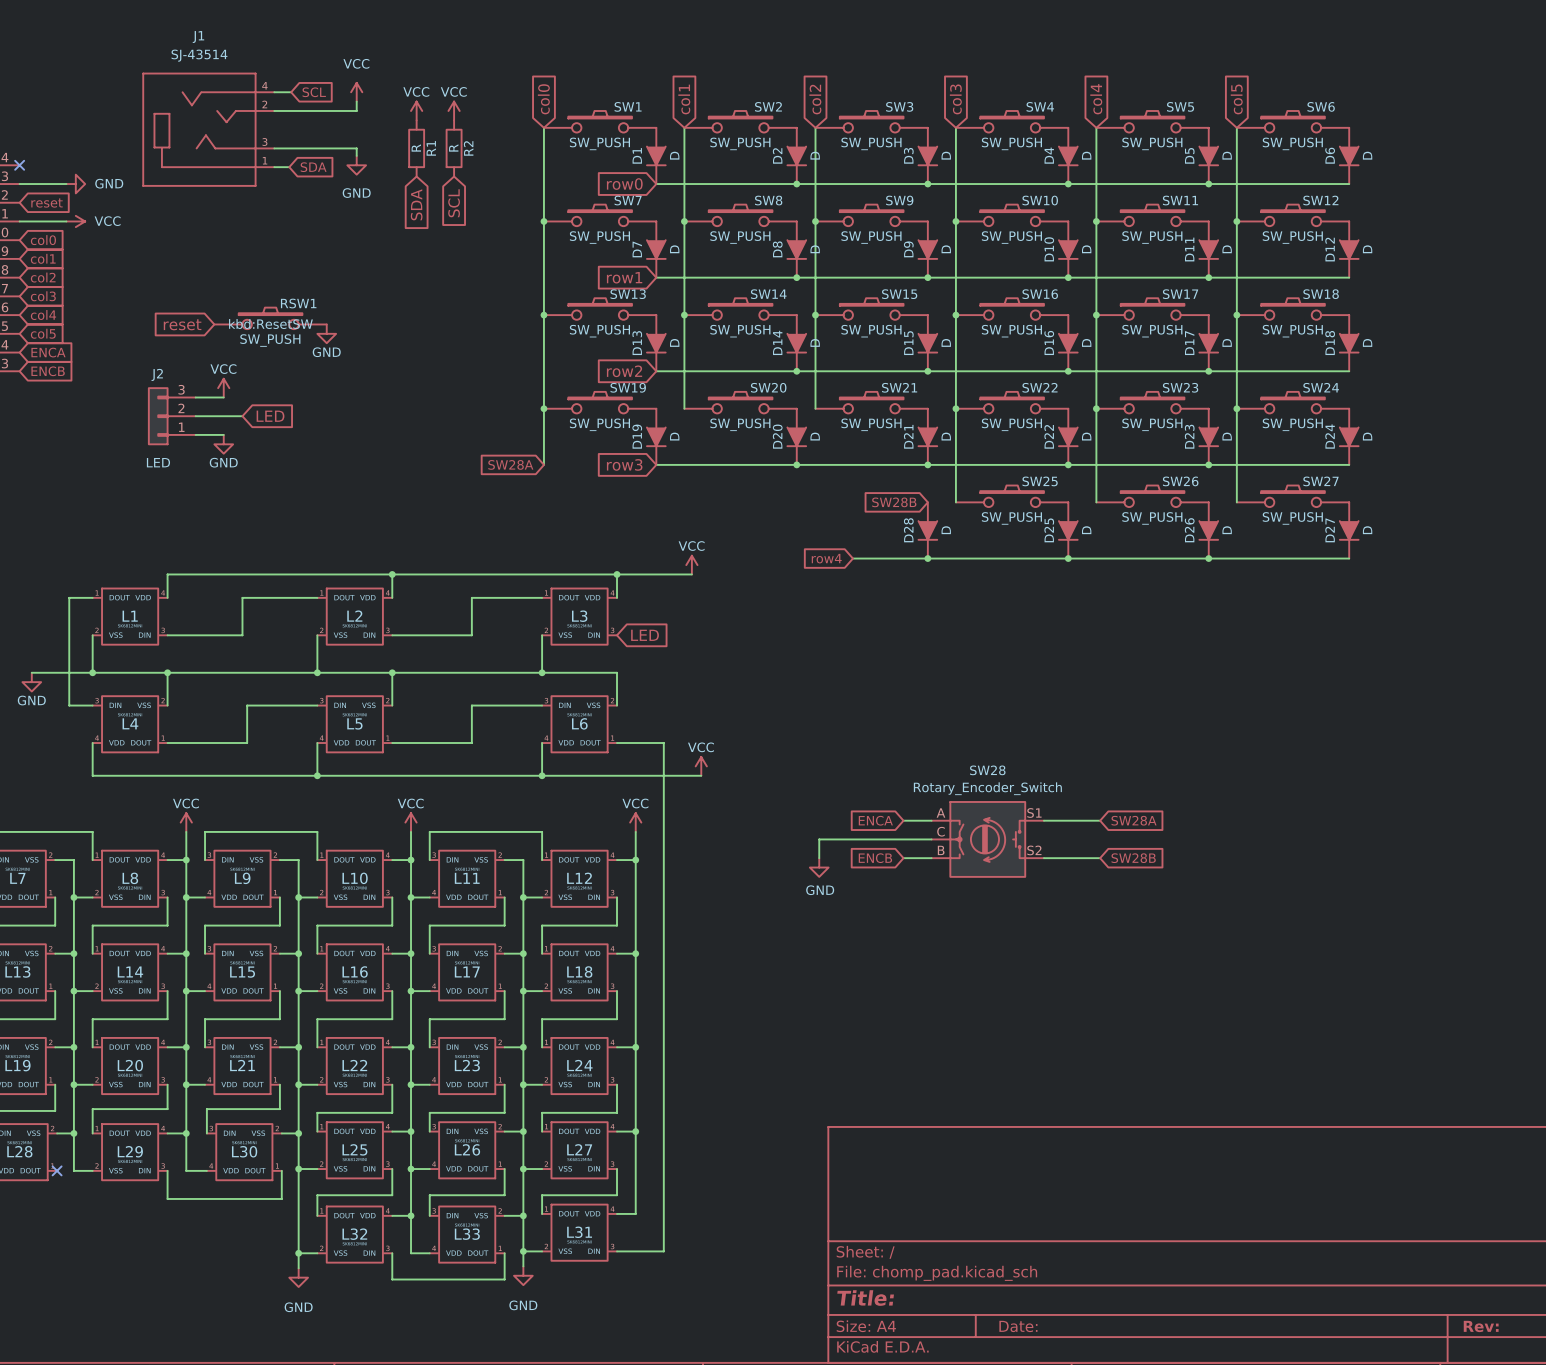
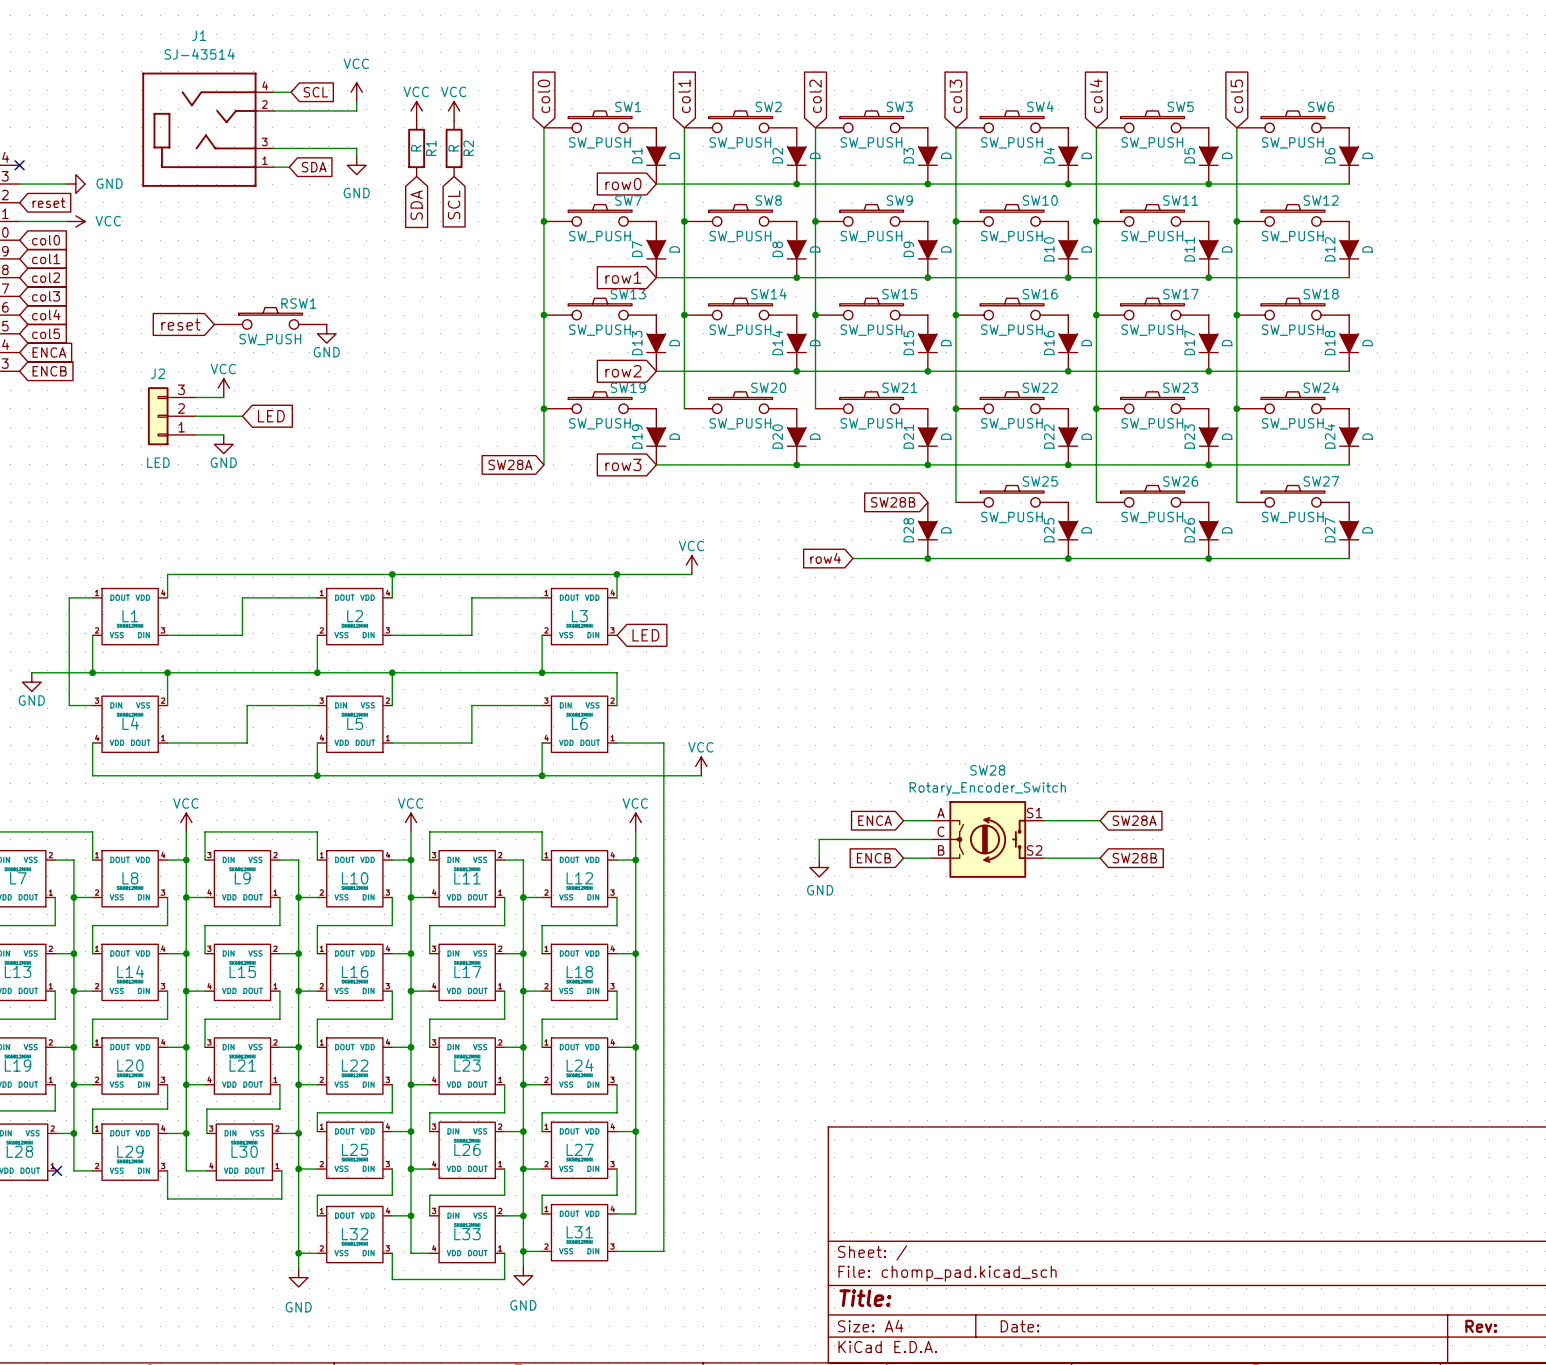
RSW1 text: kbd:ResetSW (270, 324) -> none

